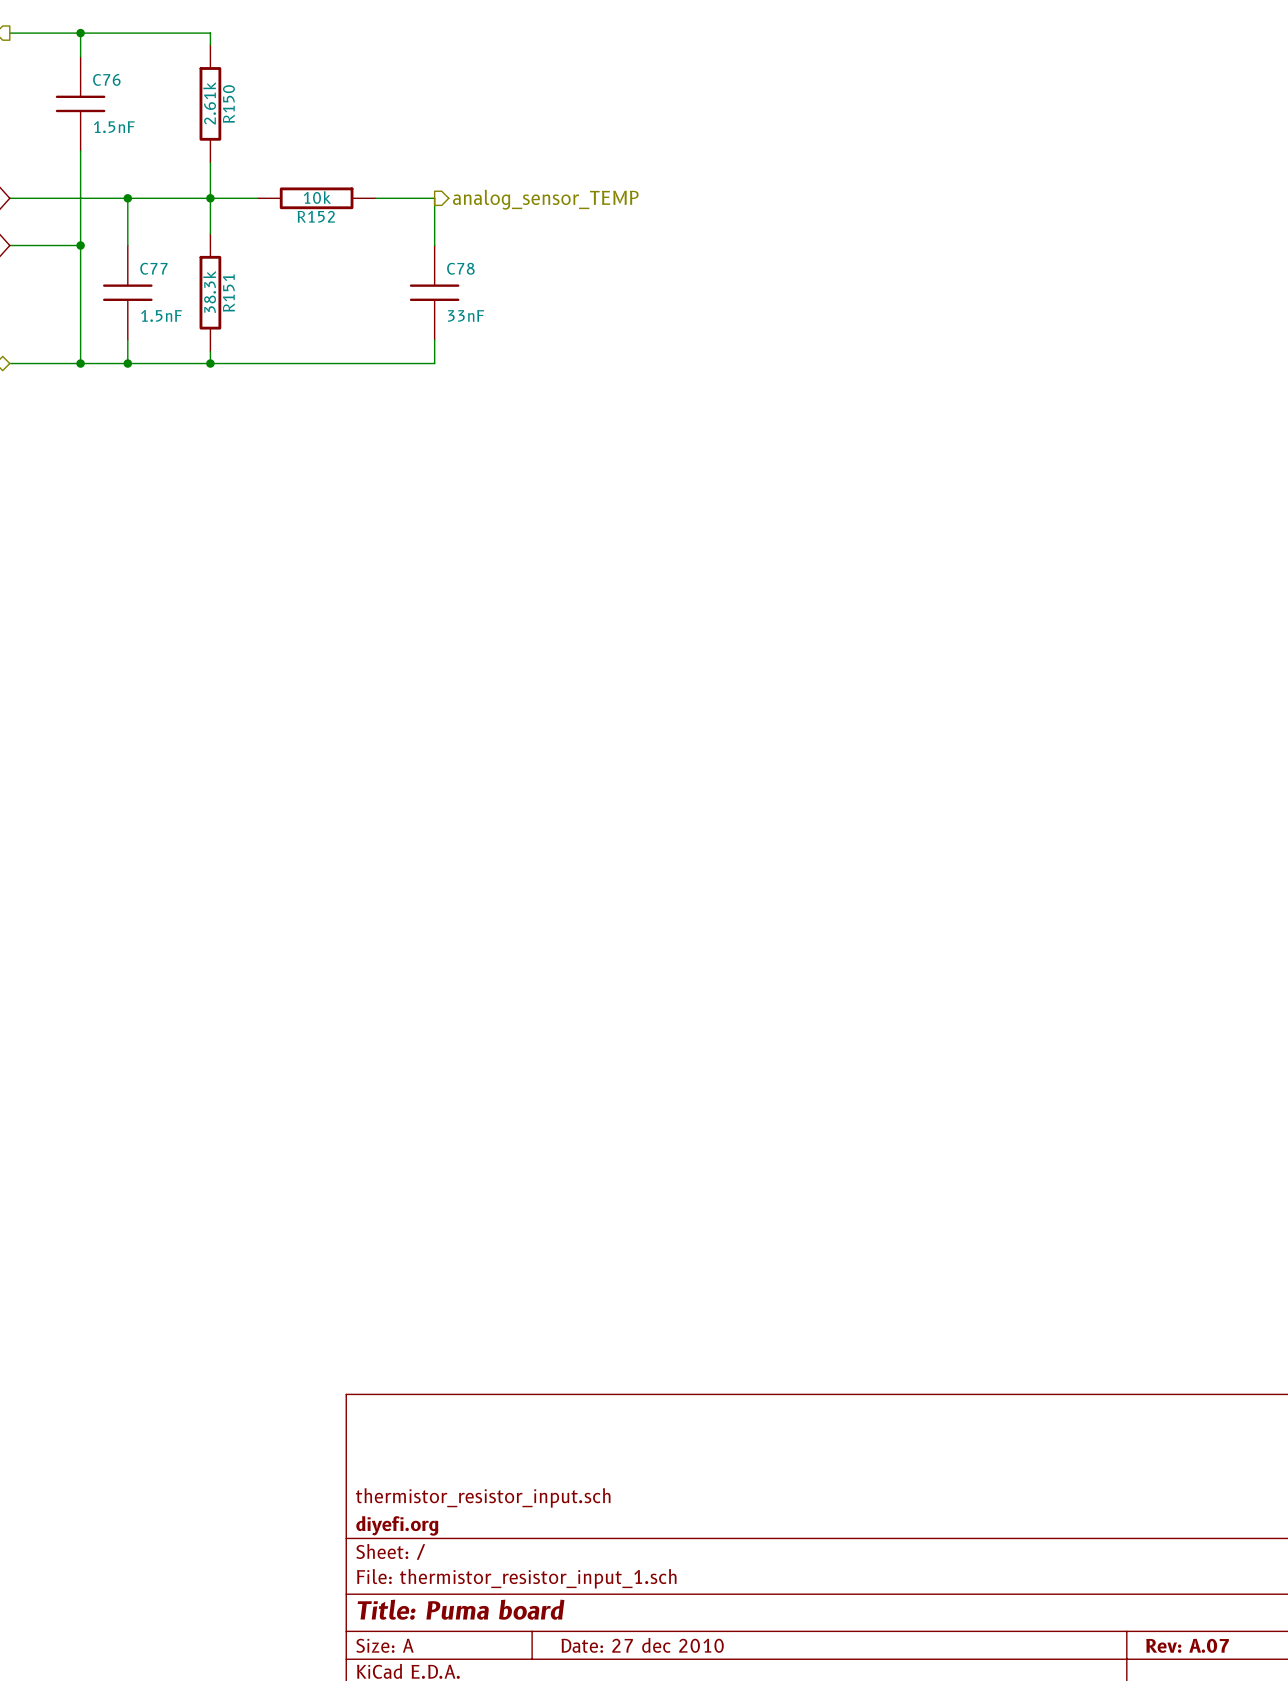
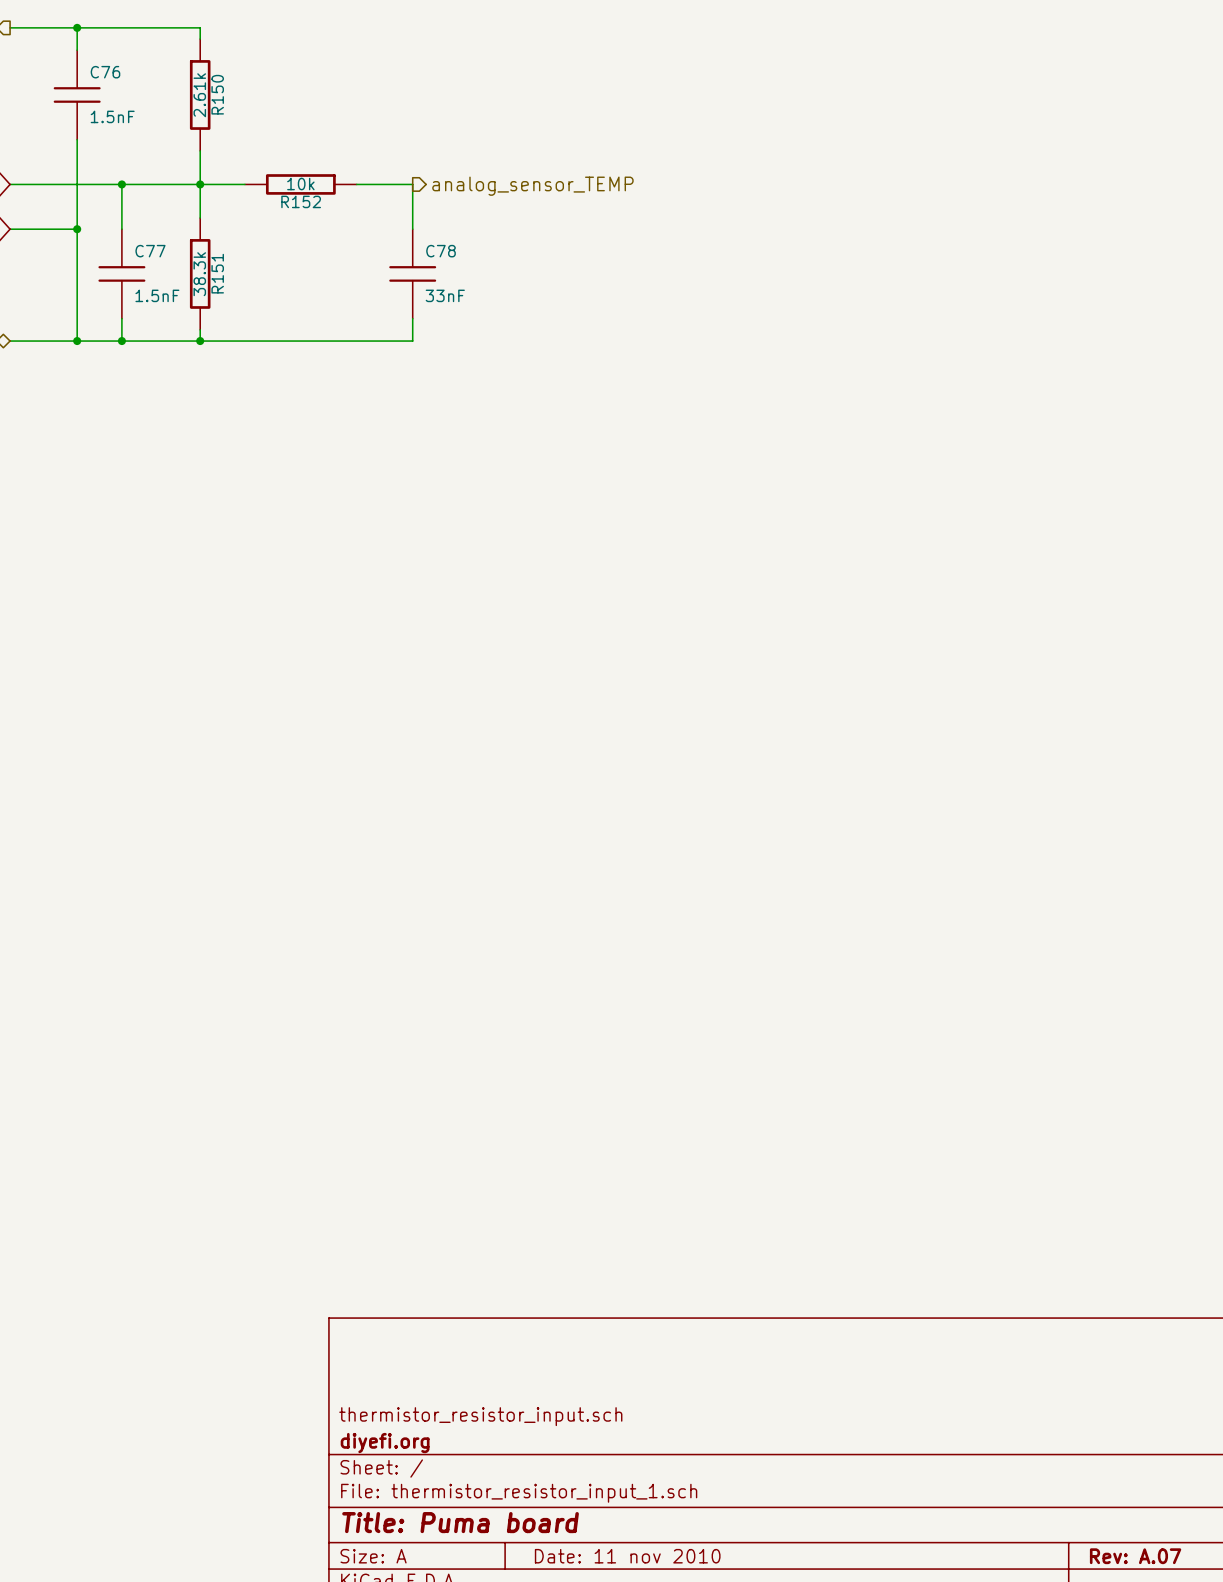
title block: Date: 27 dec 2010 (642, 1645) -> Date: 11 nov 2010 (627, 1556)

